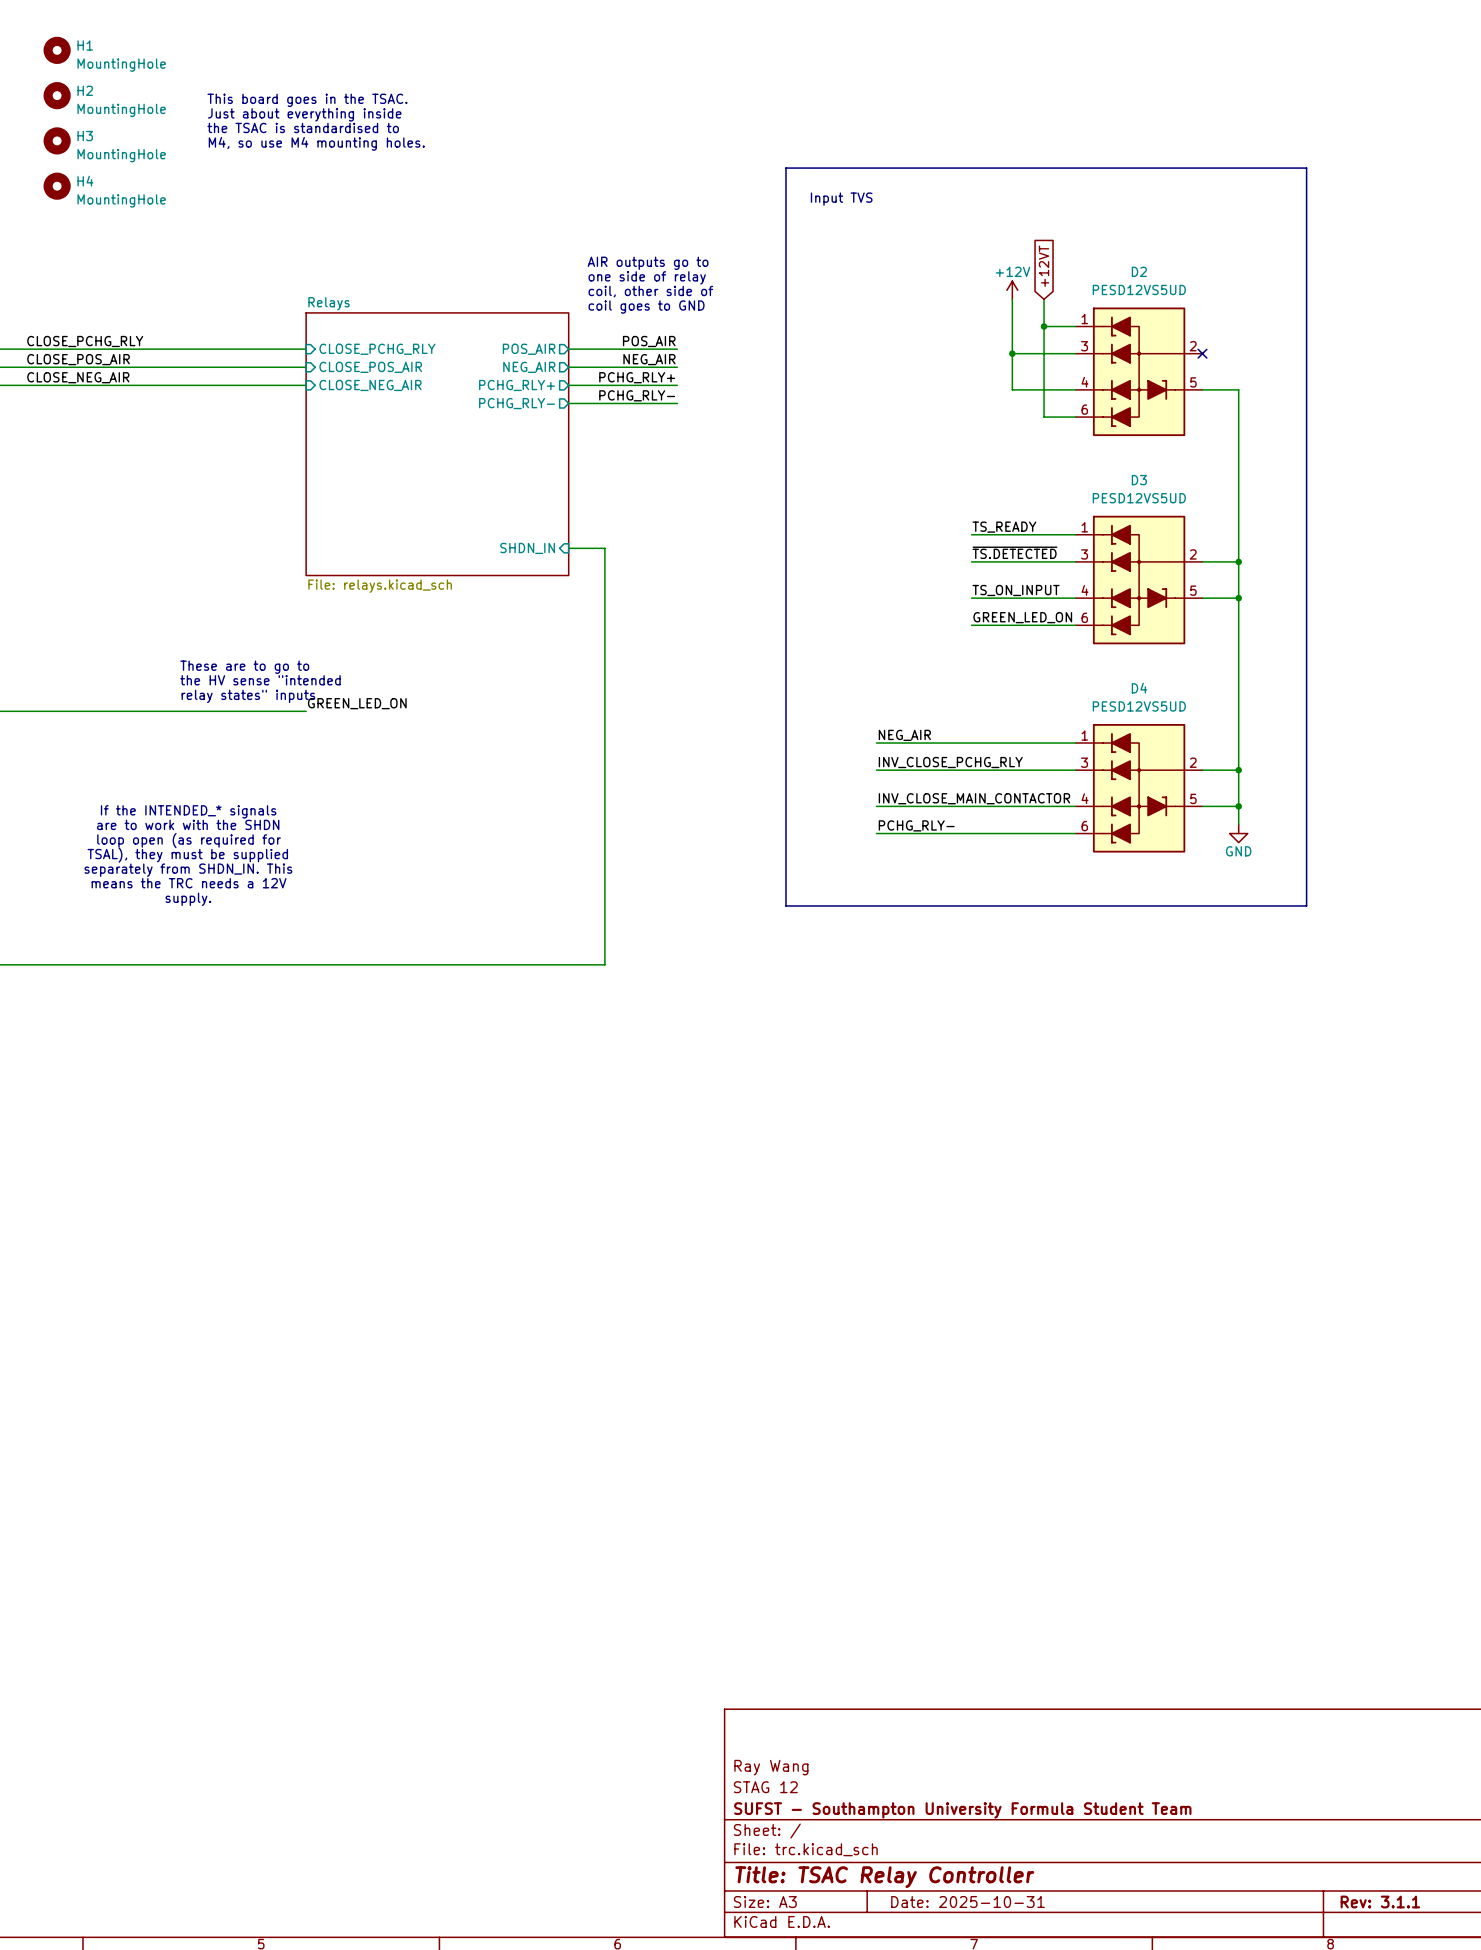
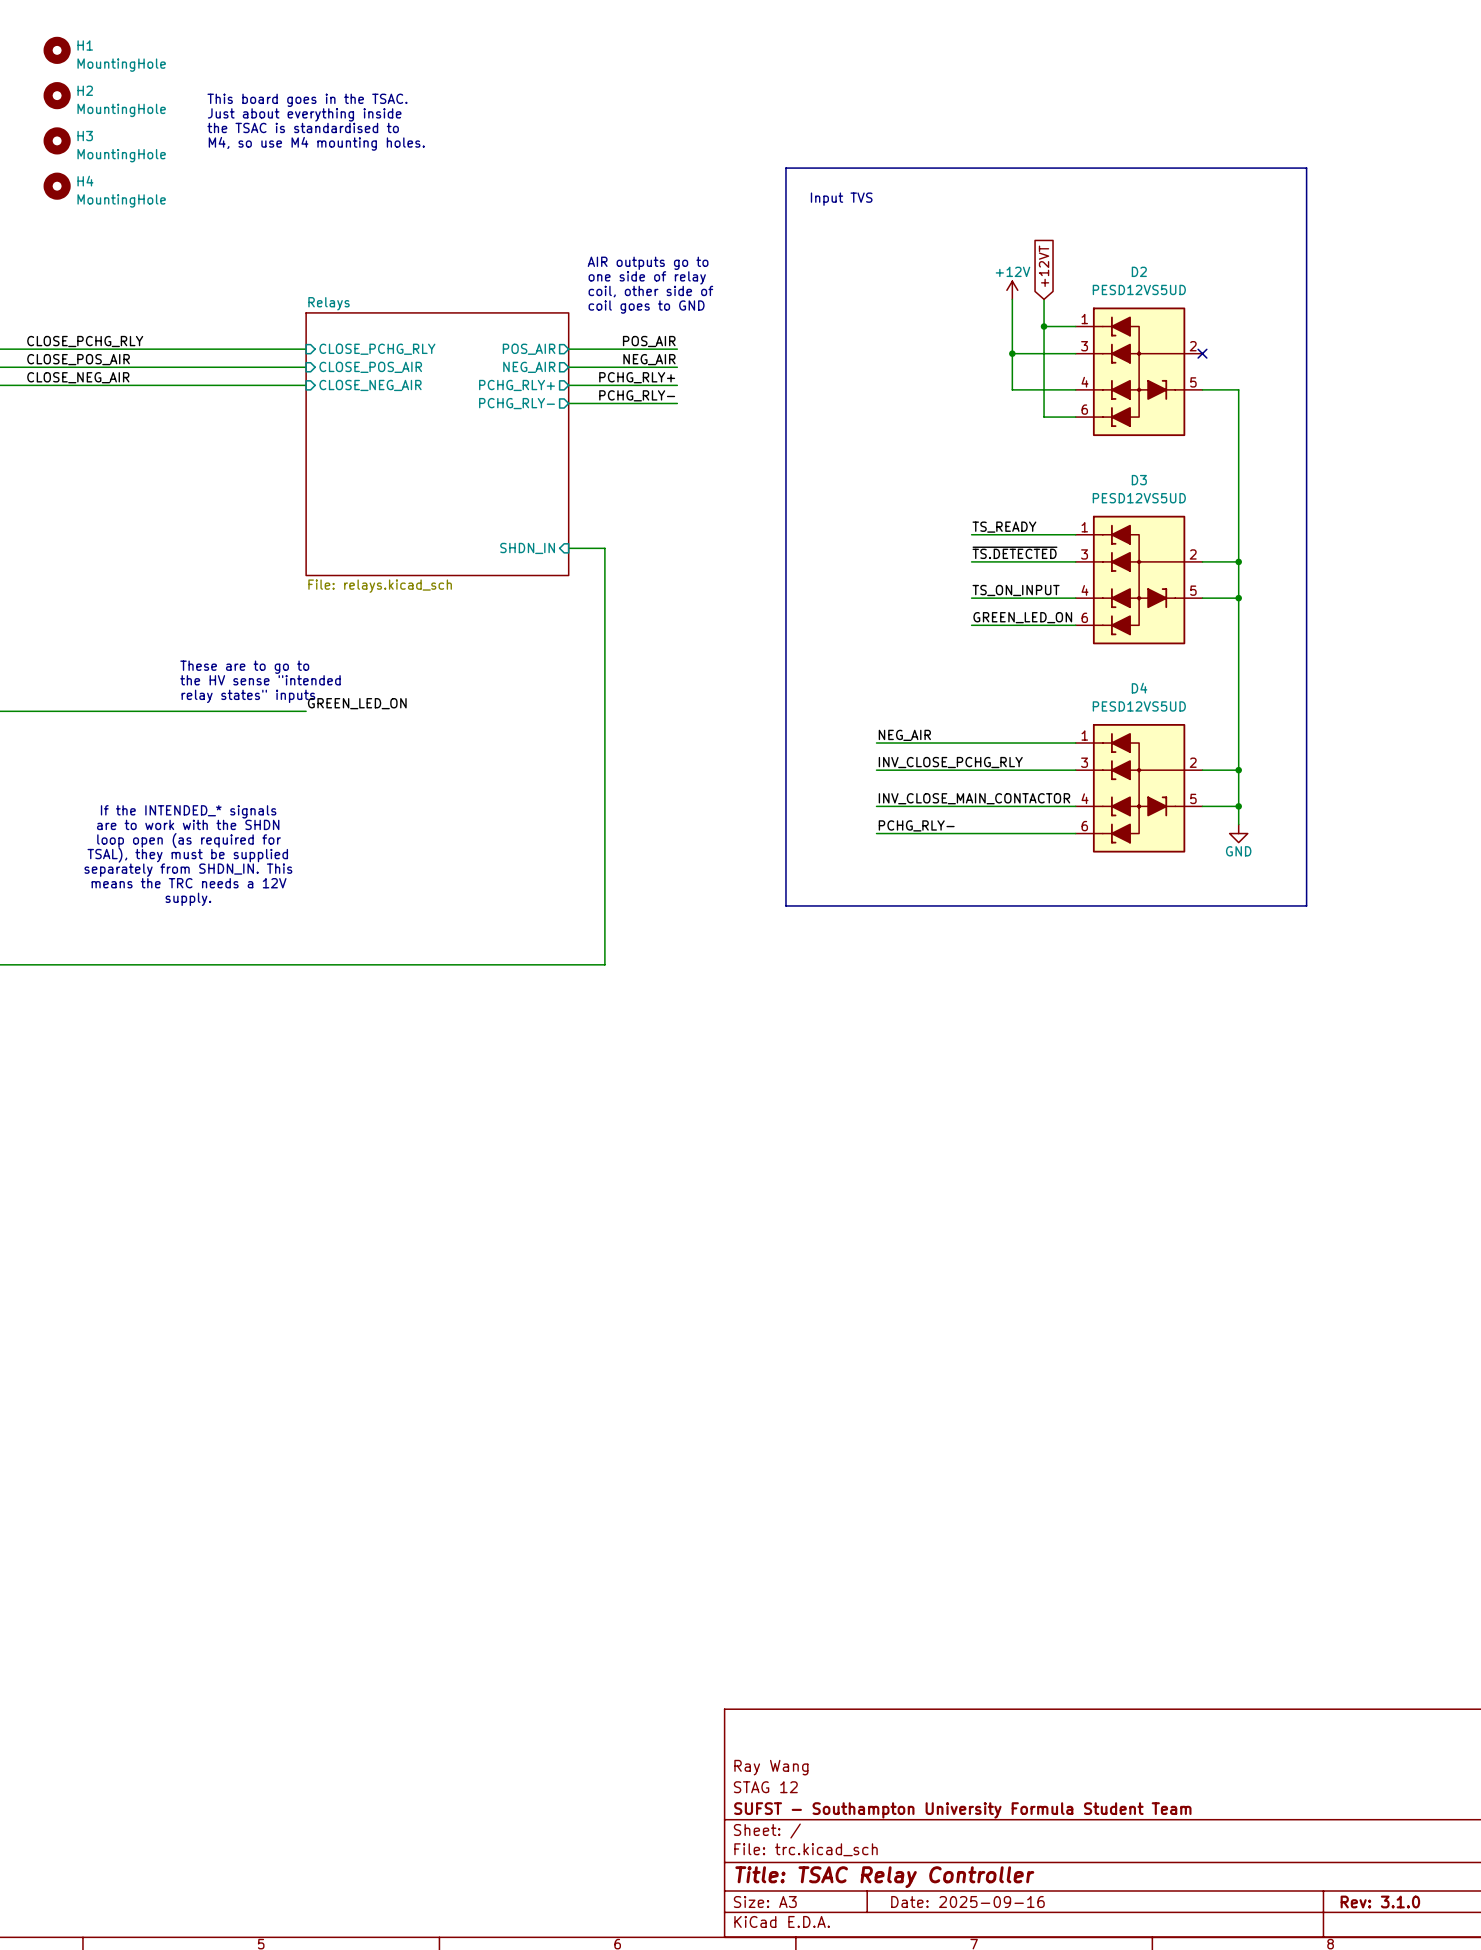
title block: Date: 2025-10-31 (967, 1902) -> Date: 2025-09-16 (967, 1902)
title block: Rev: 3.1.1 (1380, 1902) -> Rev: 3.1.0 (1380, 1902)

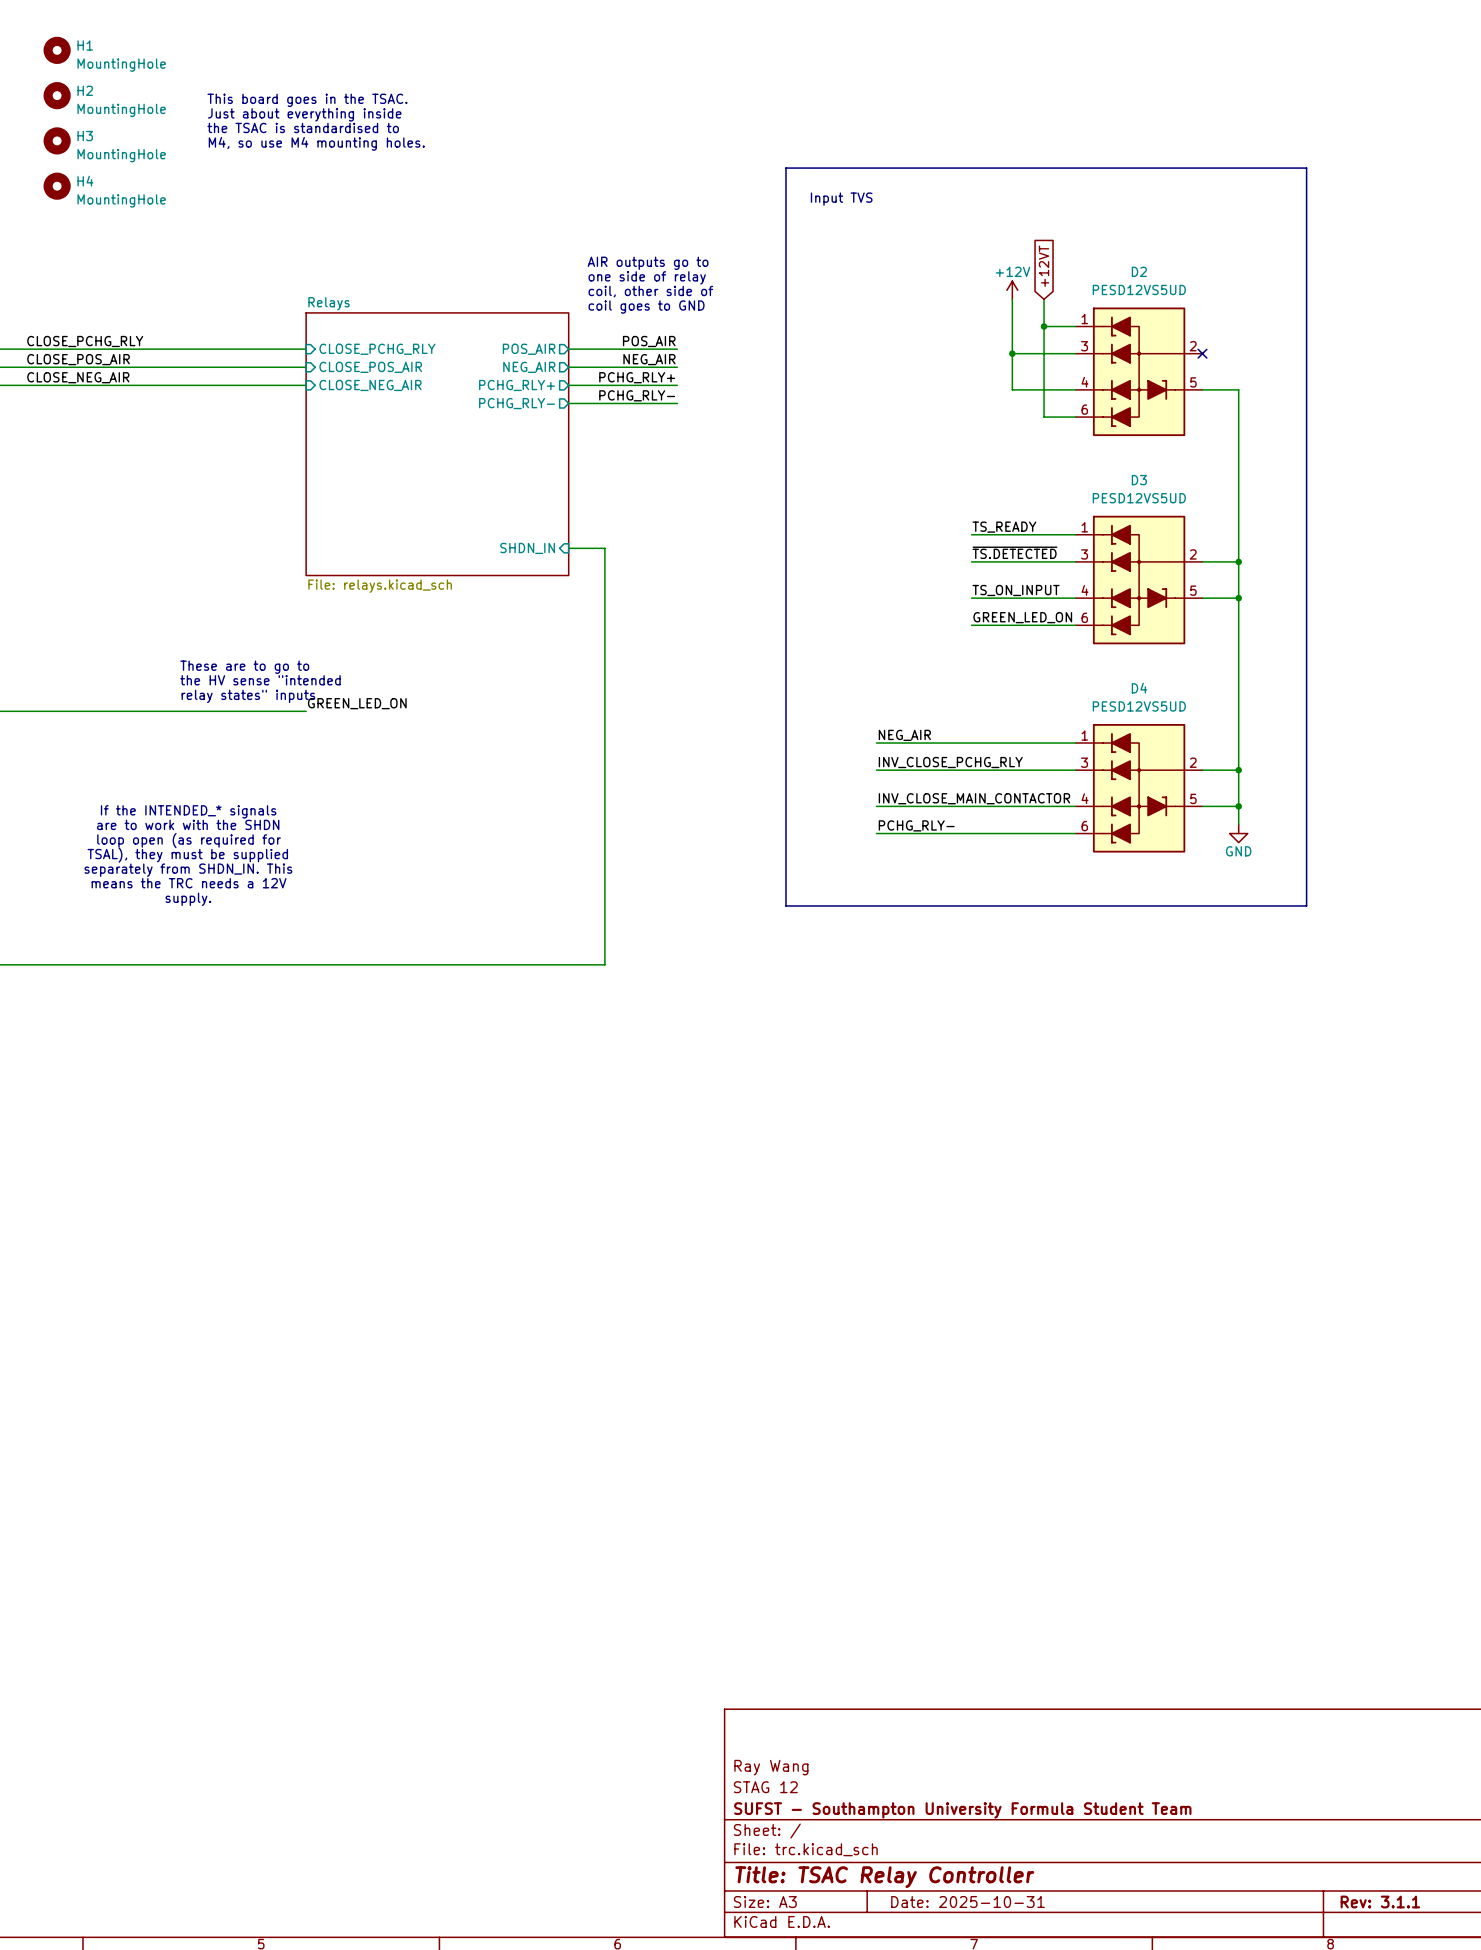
title block: Date: 2025-09-16 (967, 1902) -> Date: 2025-10-31 (967, 1902)
title block: Rev: 3.1.0 (1380, 1902) -> Rev: 3.1.1 (1380, 1902)

